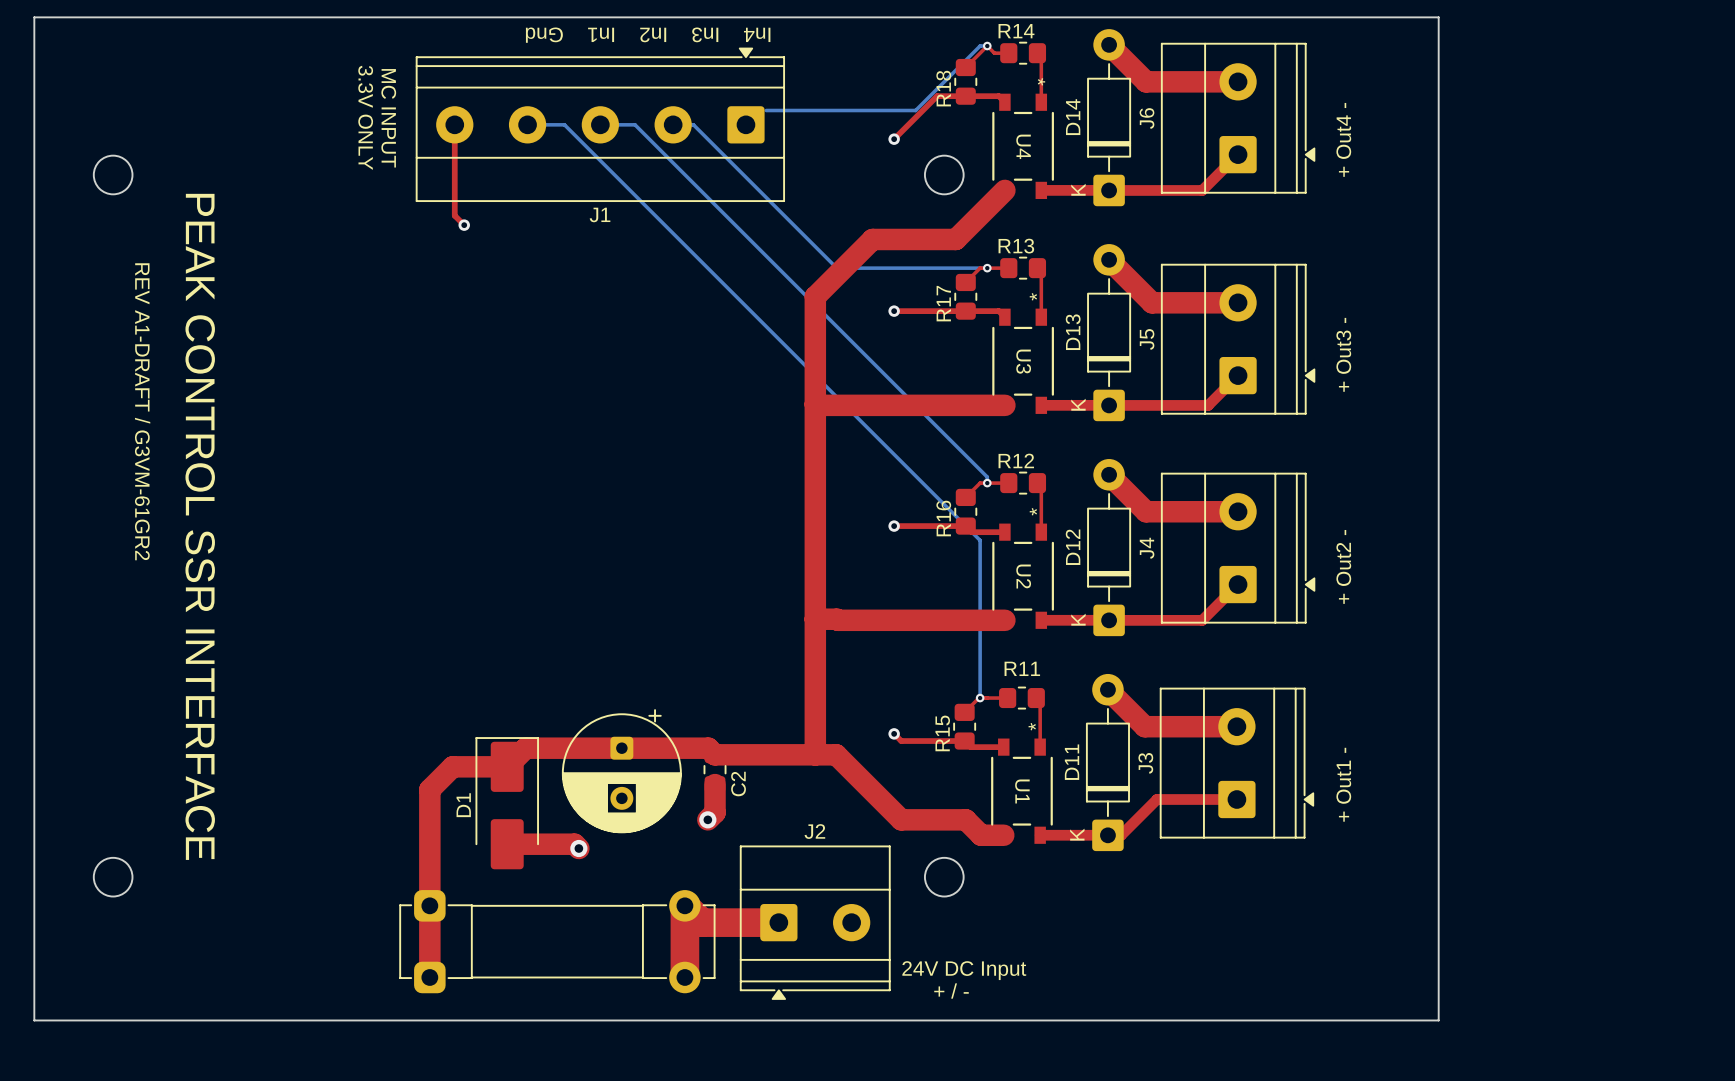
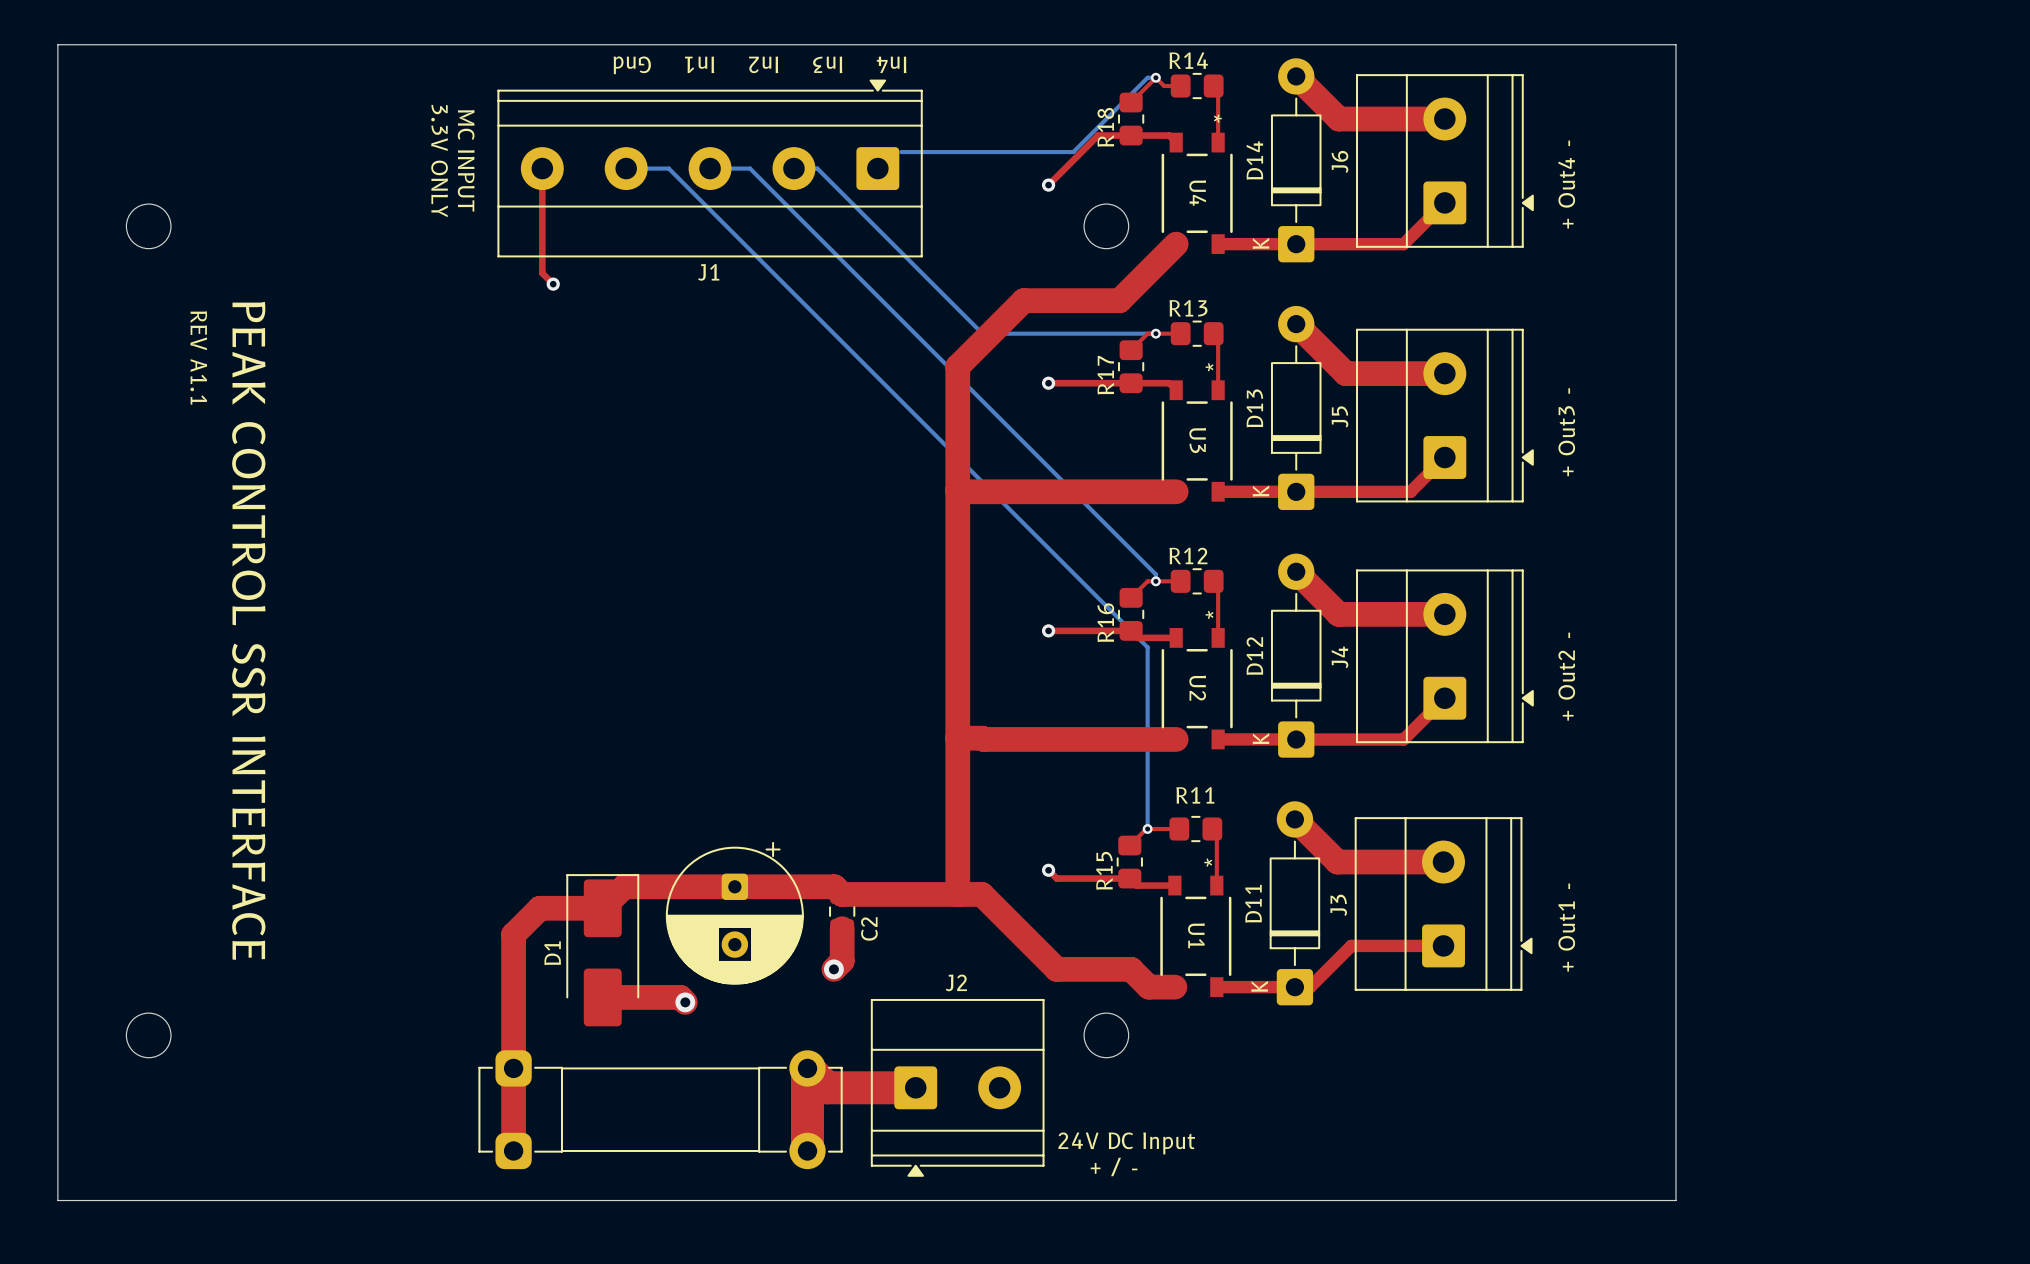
text: none -> REV A1.1 (198, 357)
text: REV A1-DRAFT / G3VM-61GR2 (142, 411) -> none

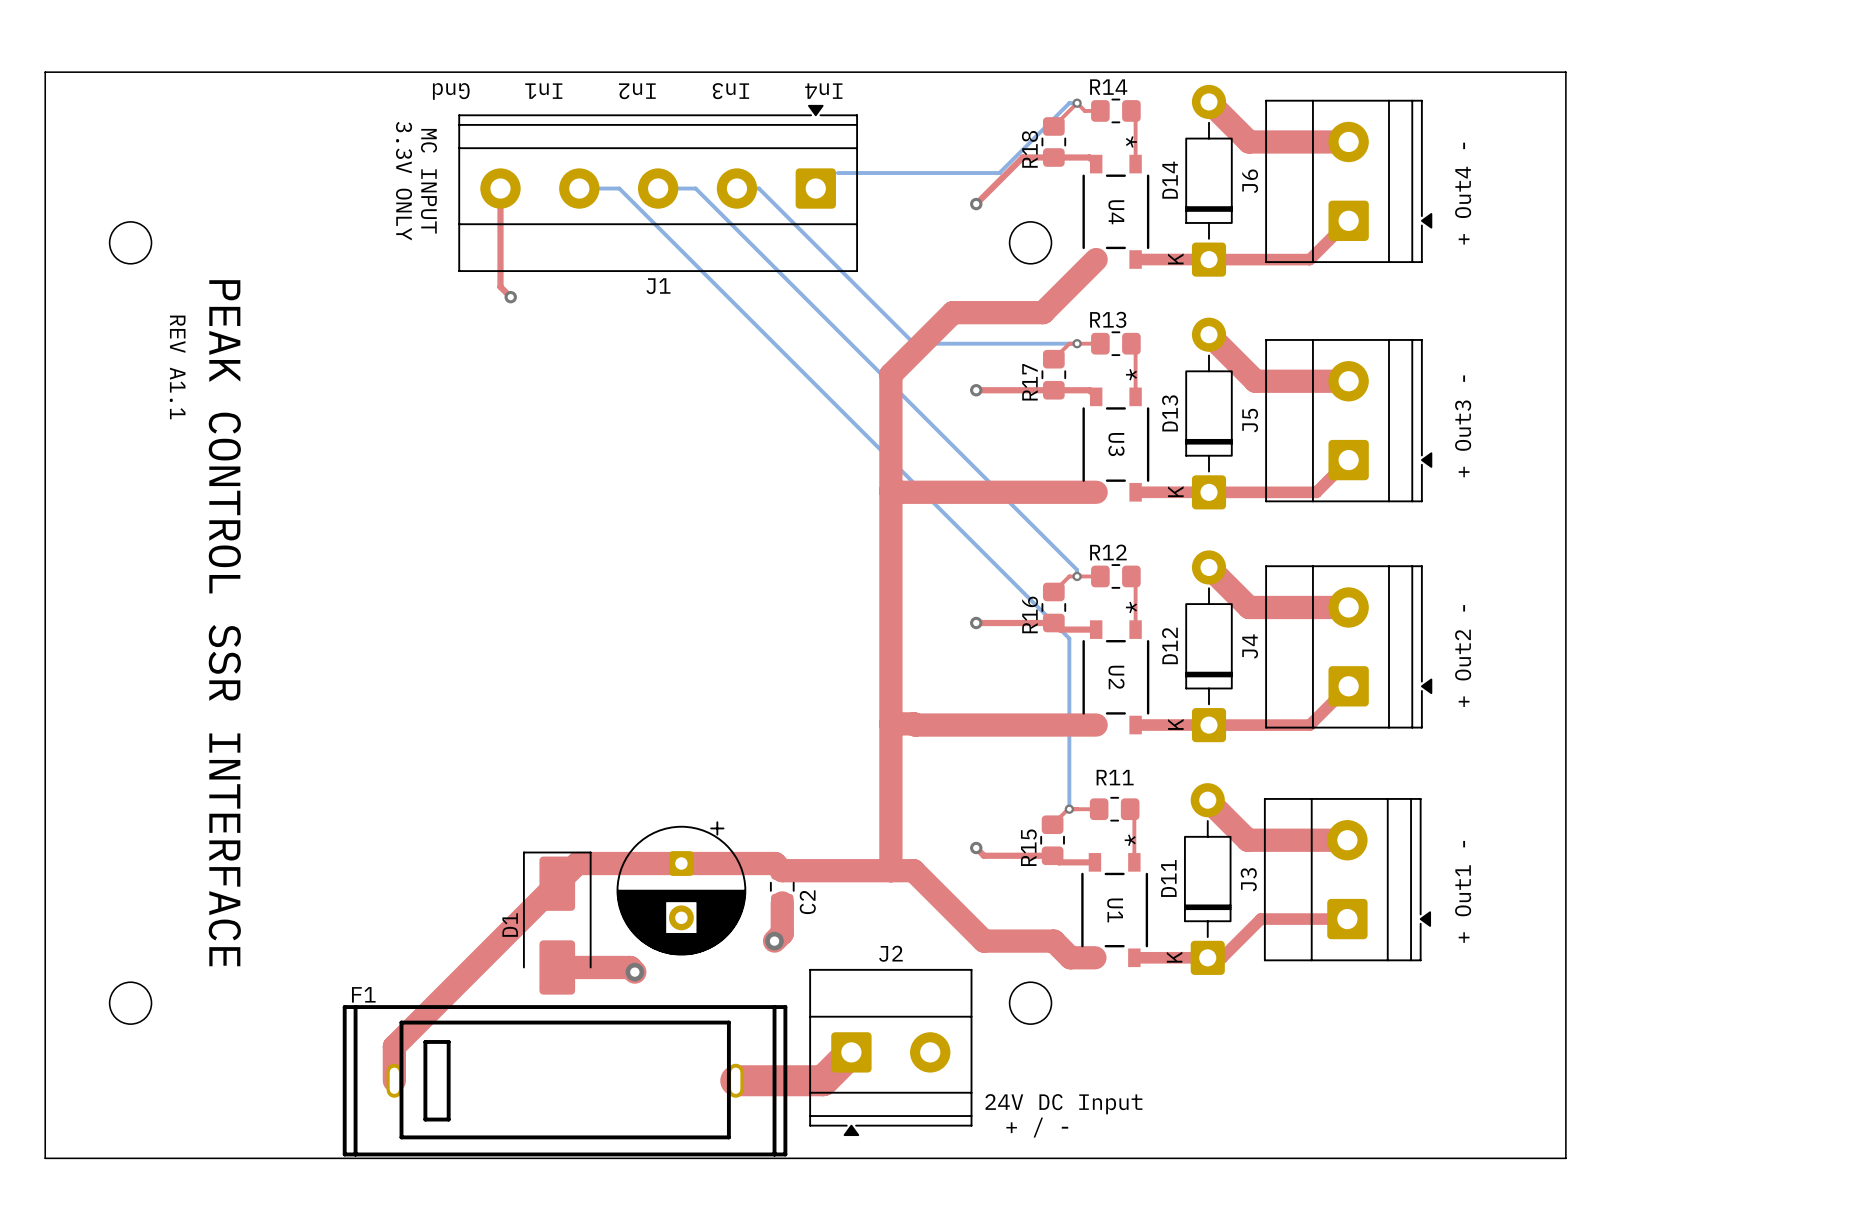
top track: (602, 908) (540, 908) (513, 934) (513, 1150) -> (557, 883) (394, 1046) (394, 1080)
top track: (915, 1087) (826, 1087) (807, 1068) (807, 1150) -> (851, 1052) (823, 1080) (735, 1080)
part: (660, 1109) -> none
F1: none -> (565, 1080)

